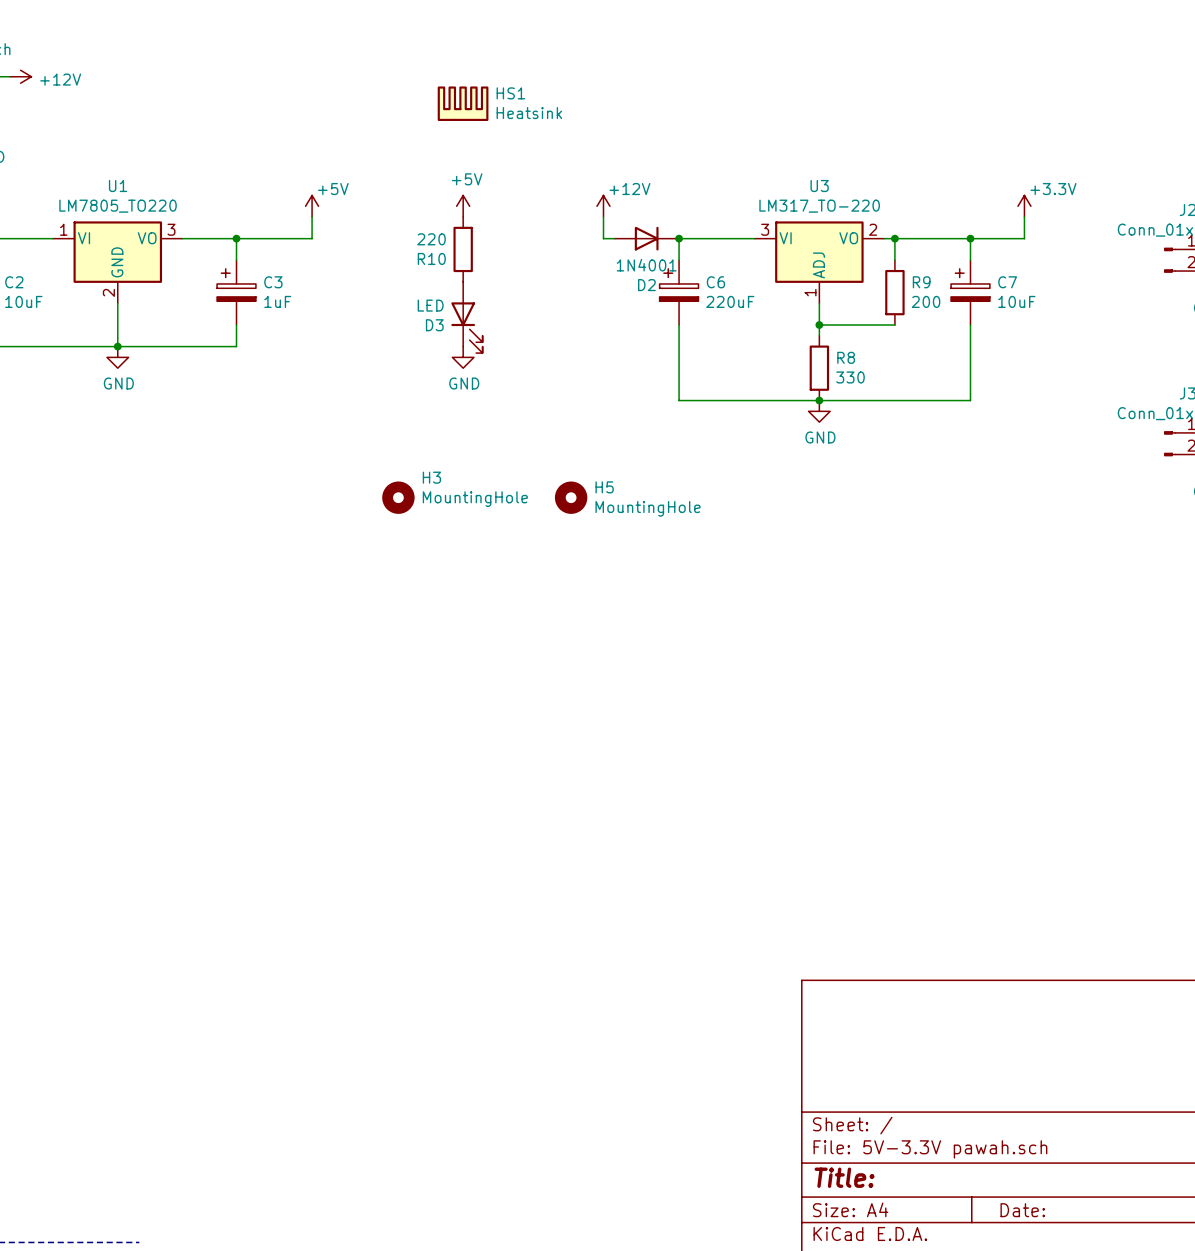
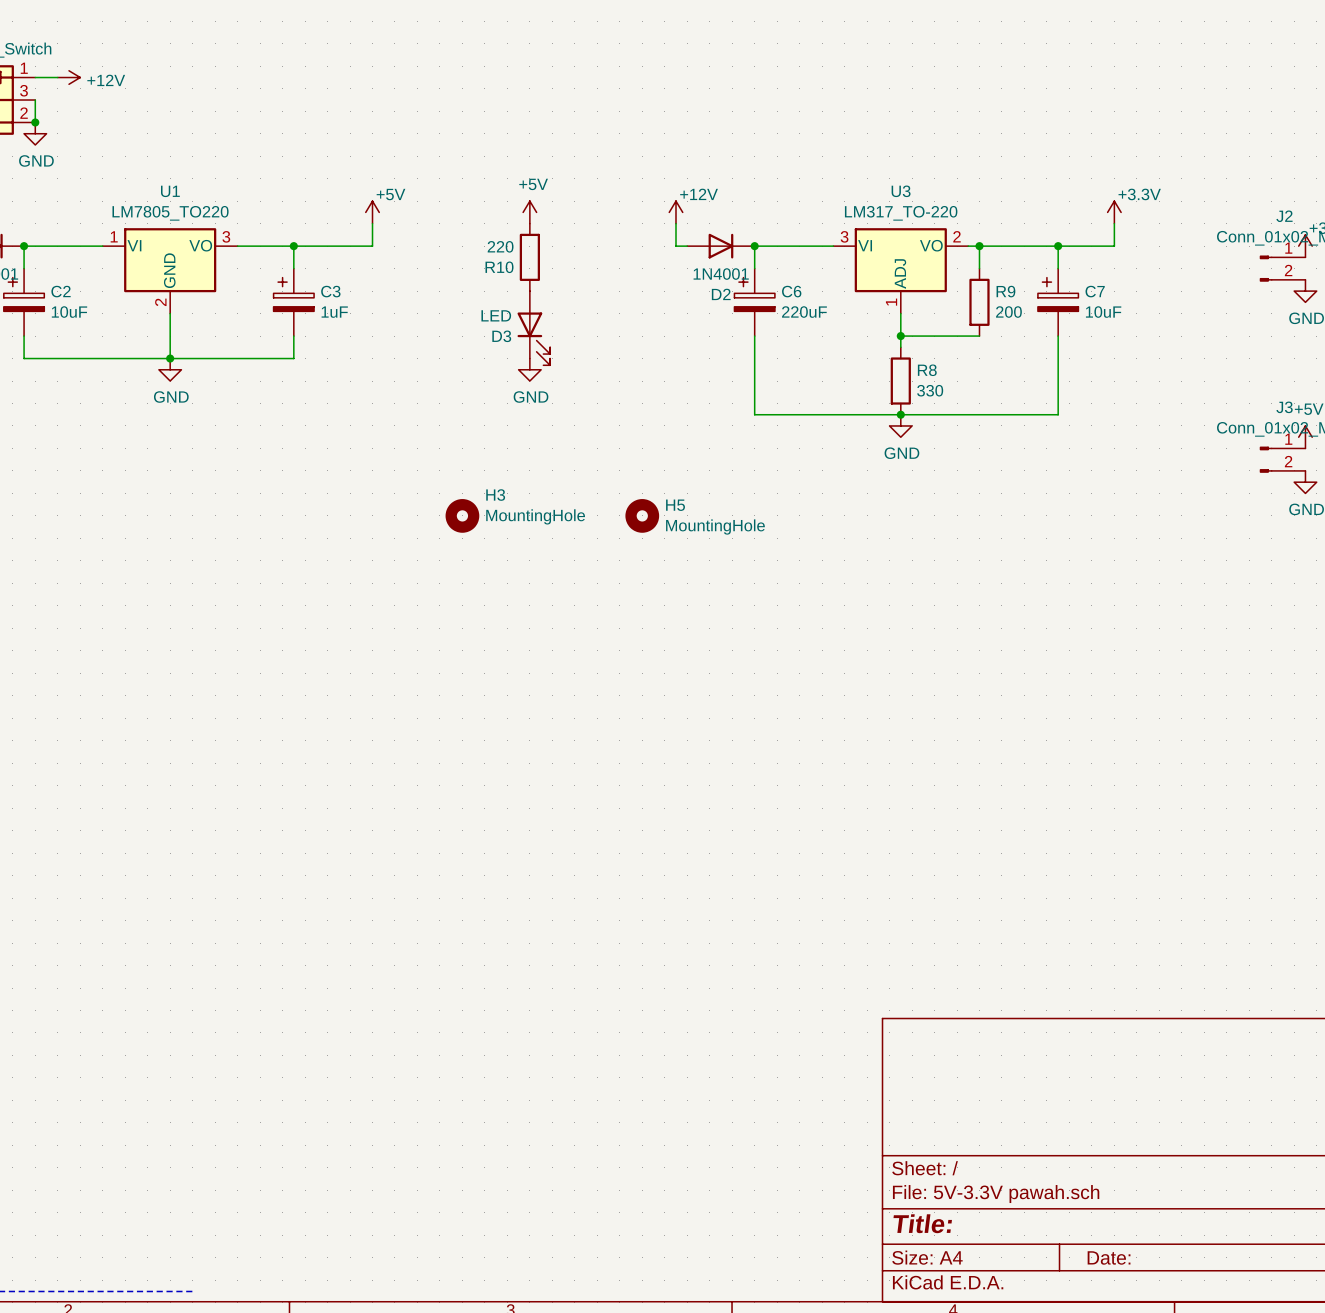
HS1: Heatsink (463, 103) -> none

